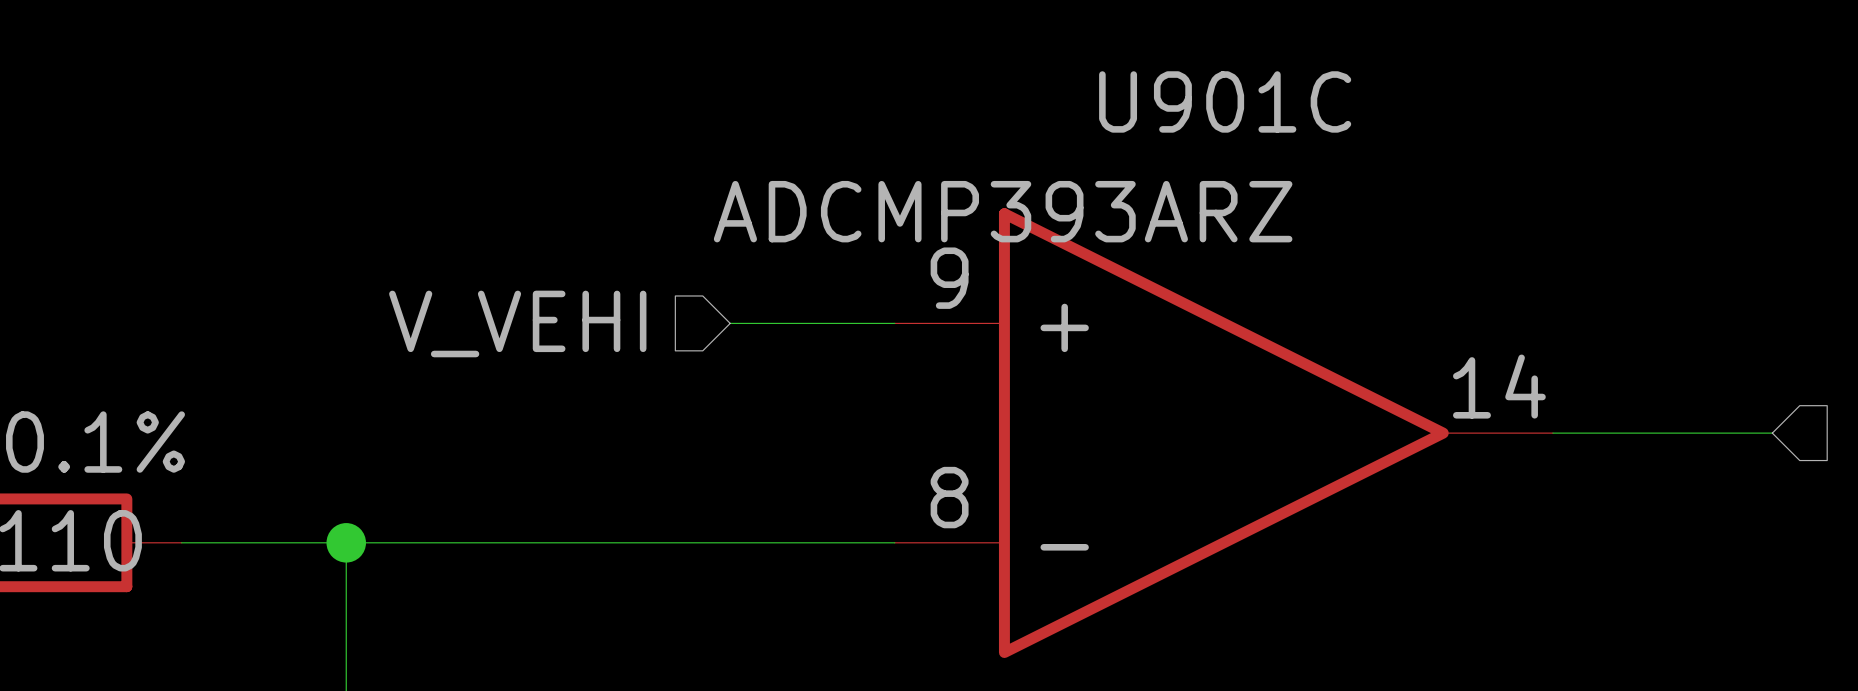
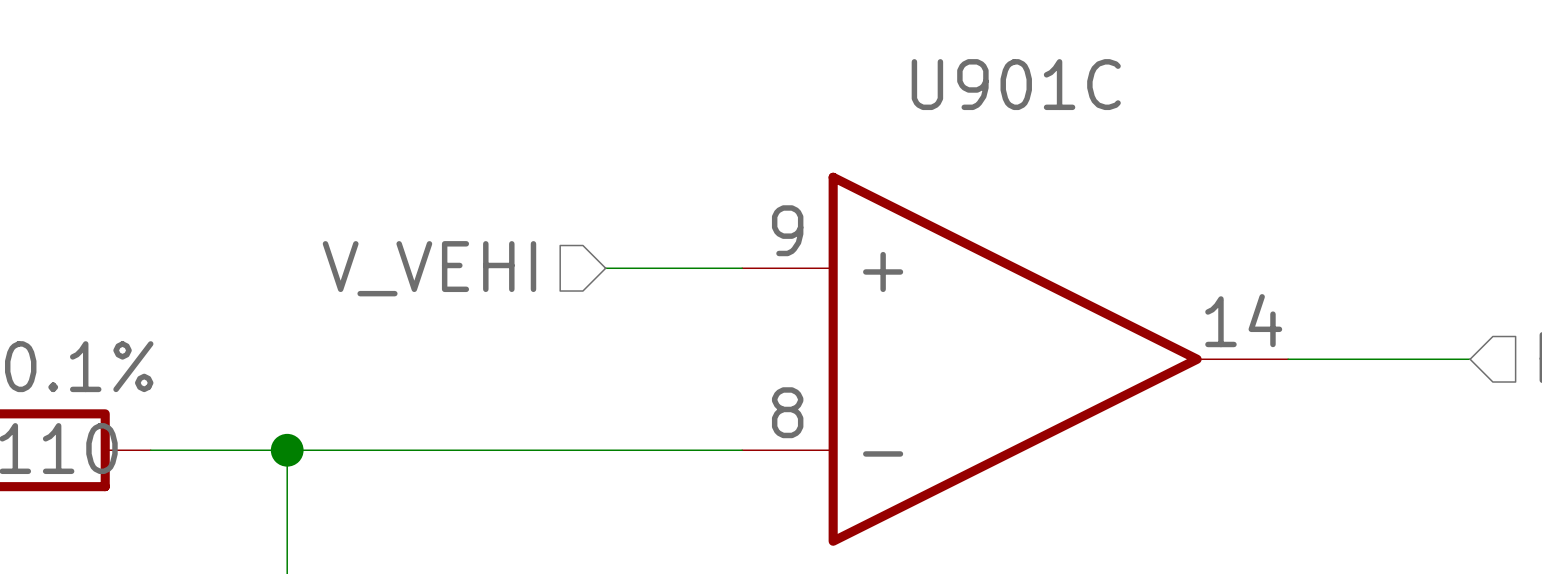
U901C value: ADCMP393ARZ (1003, 211) -> none

